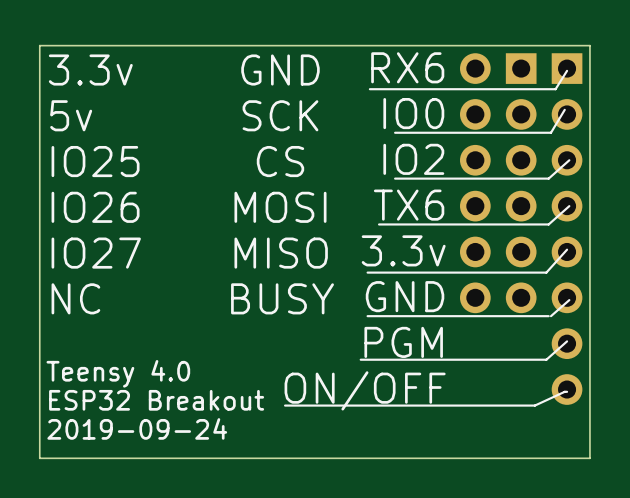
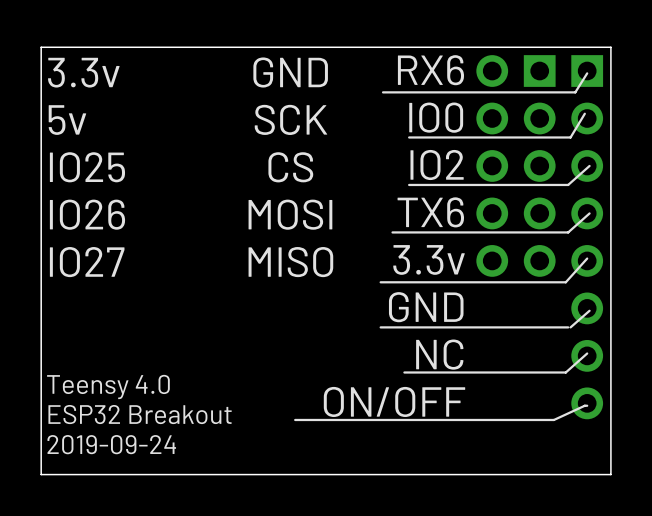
part: (498, 183) -> none
text: NC (75, 298) -> none
text: BUSY (282, 298) -> none
text: PGM (403, 342) -> NC (439, 354)
line: (390, 359) (360, 359) -> none

